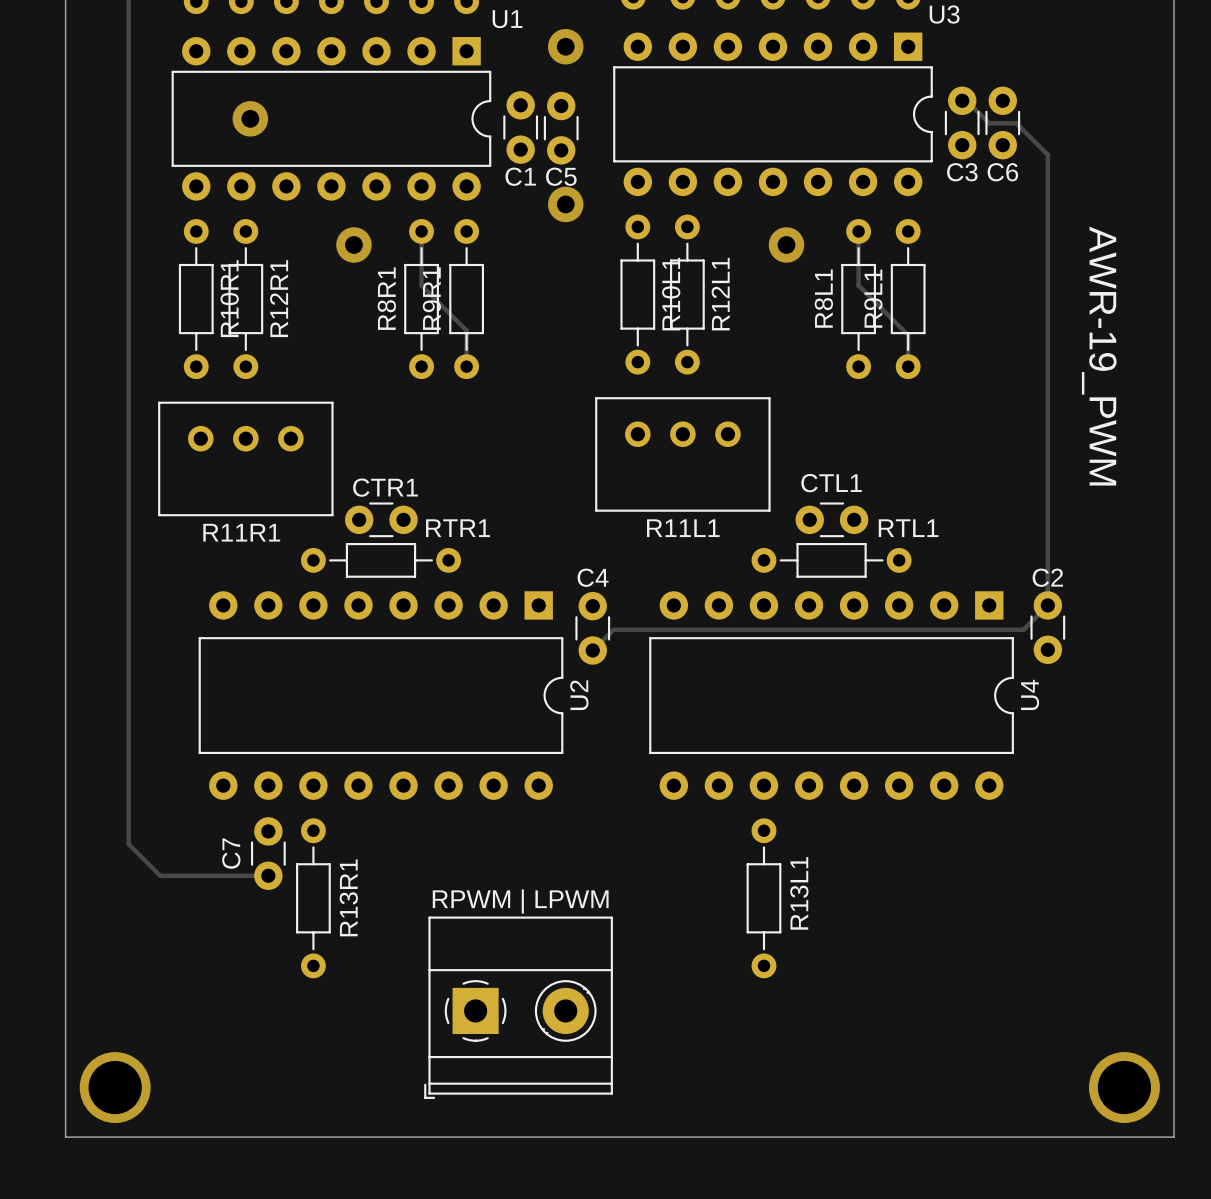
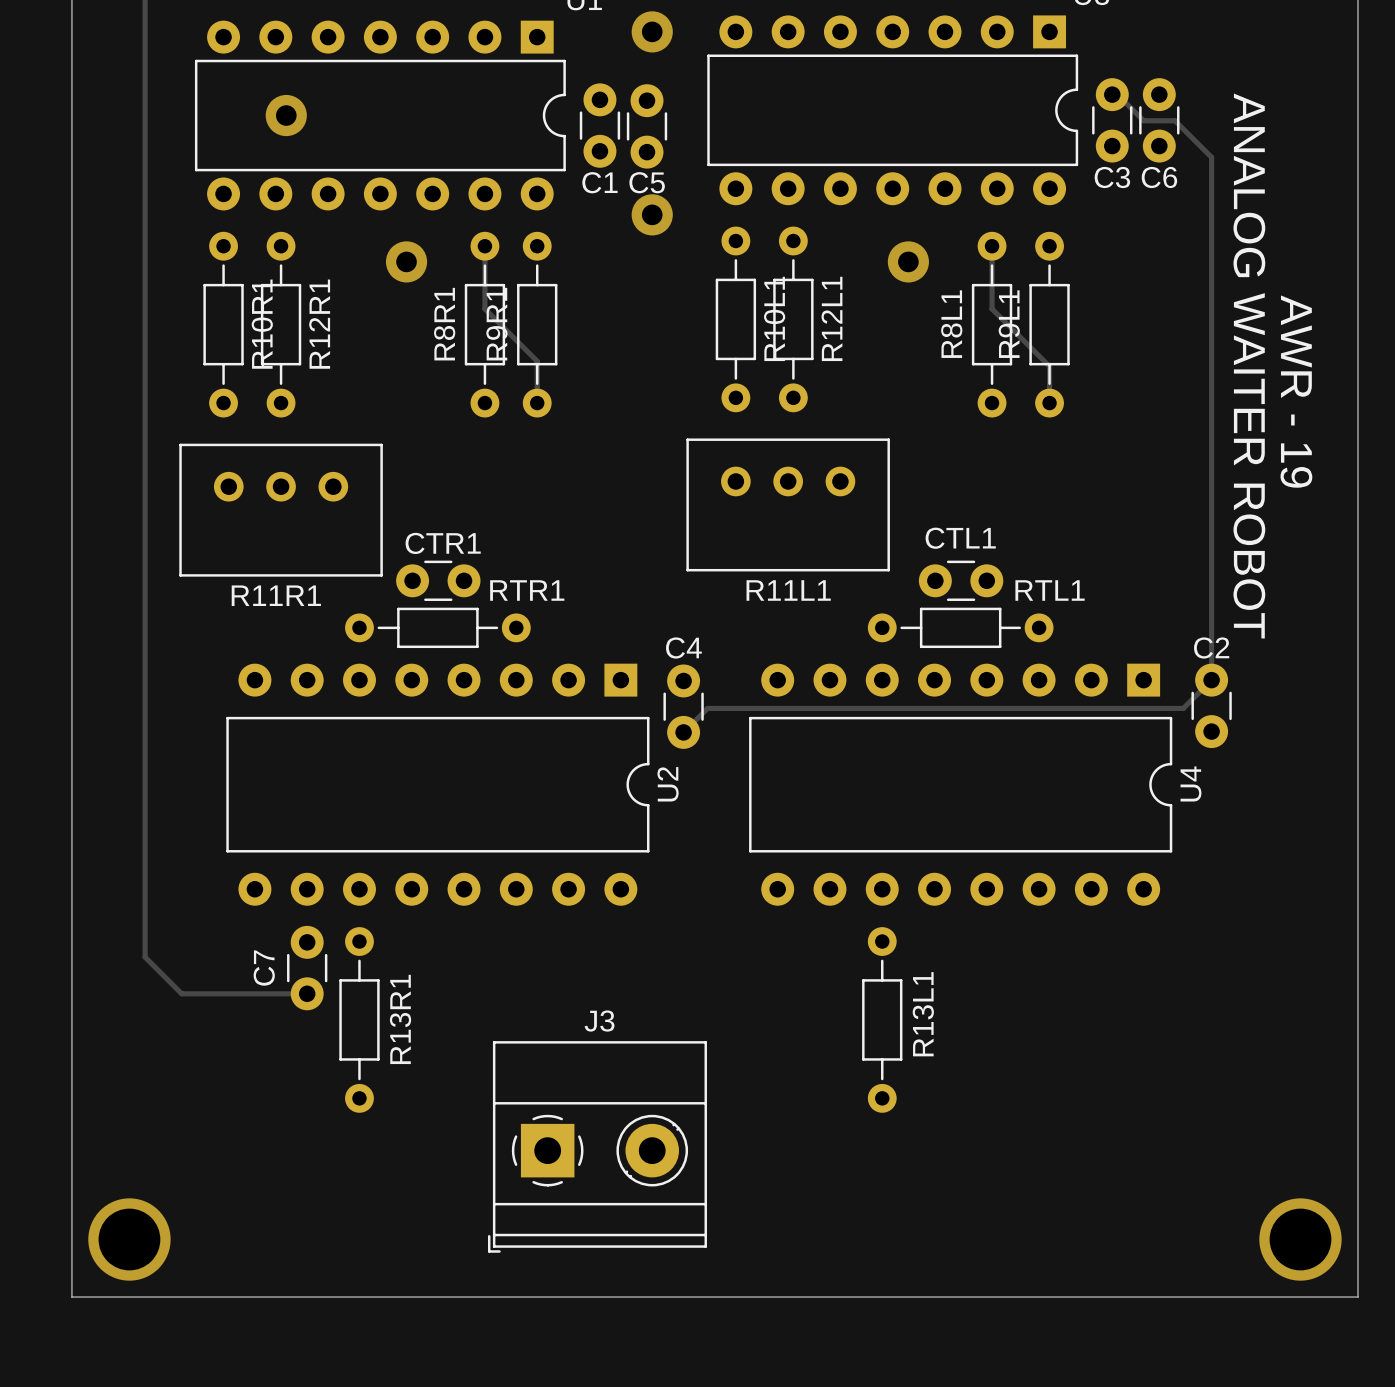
text: none -> ANALOG WAITER ROBOT (1249, 366)
text: AWR-19_PWM (1099, 356) -> AWR - 19 (1296, 391)
RPWM | LPWM name: RPWM | LPWM (520, 901) -> J3 (599, 1021)

